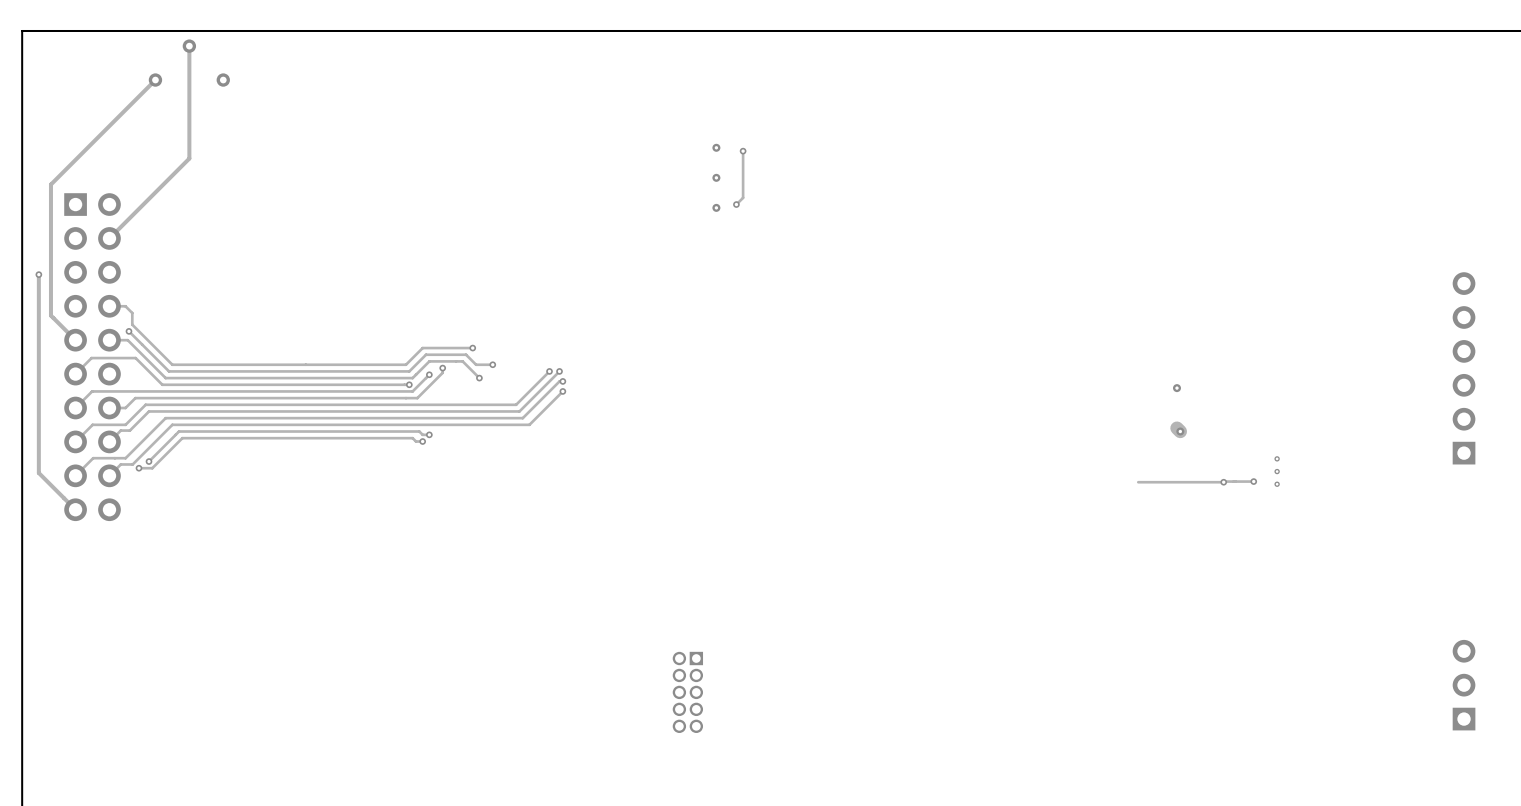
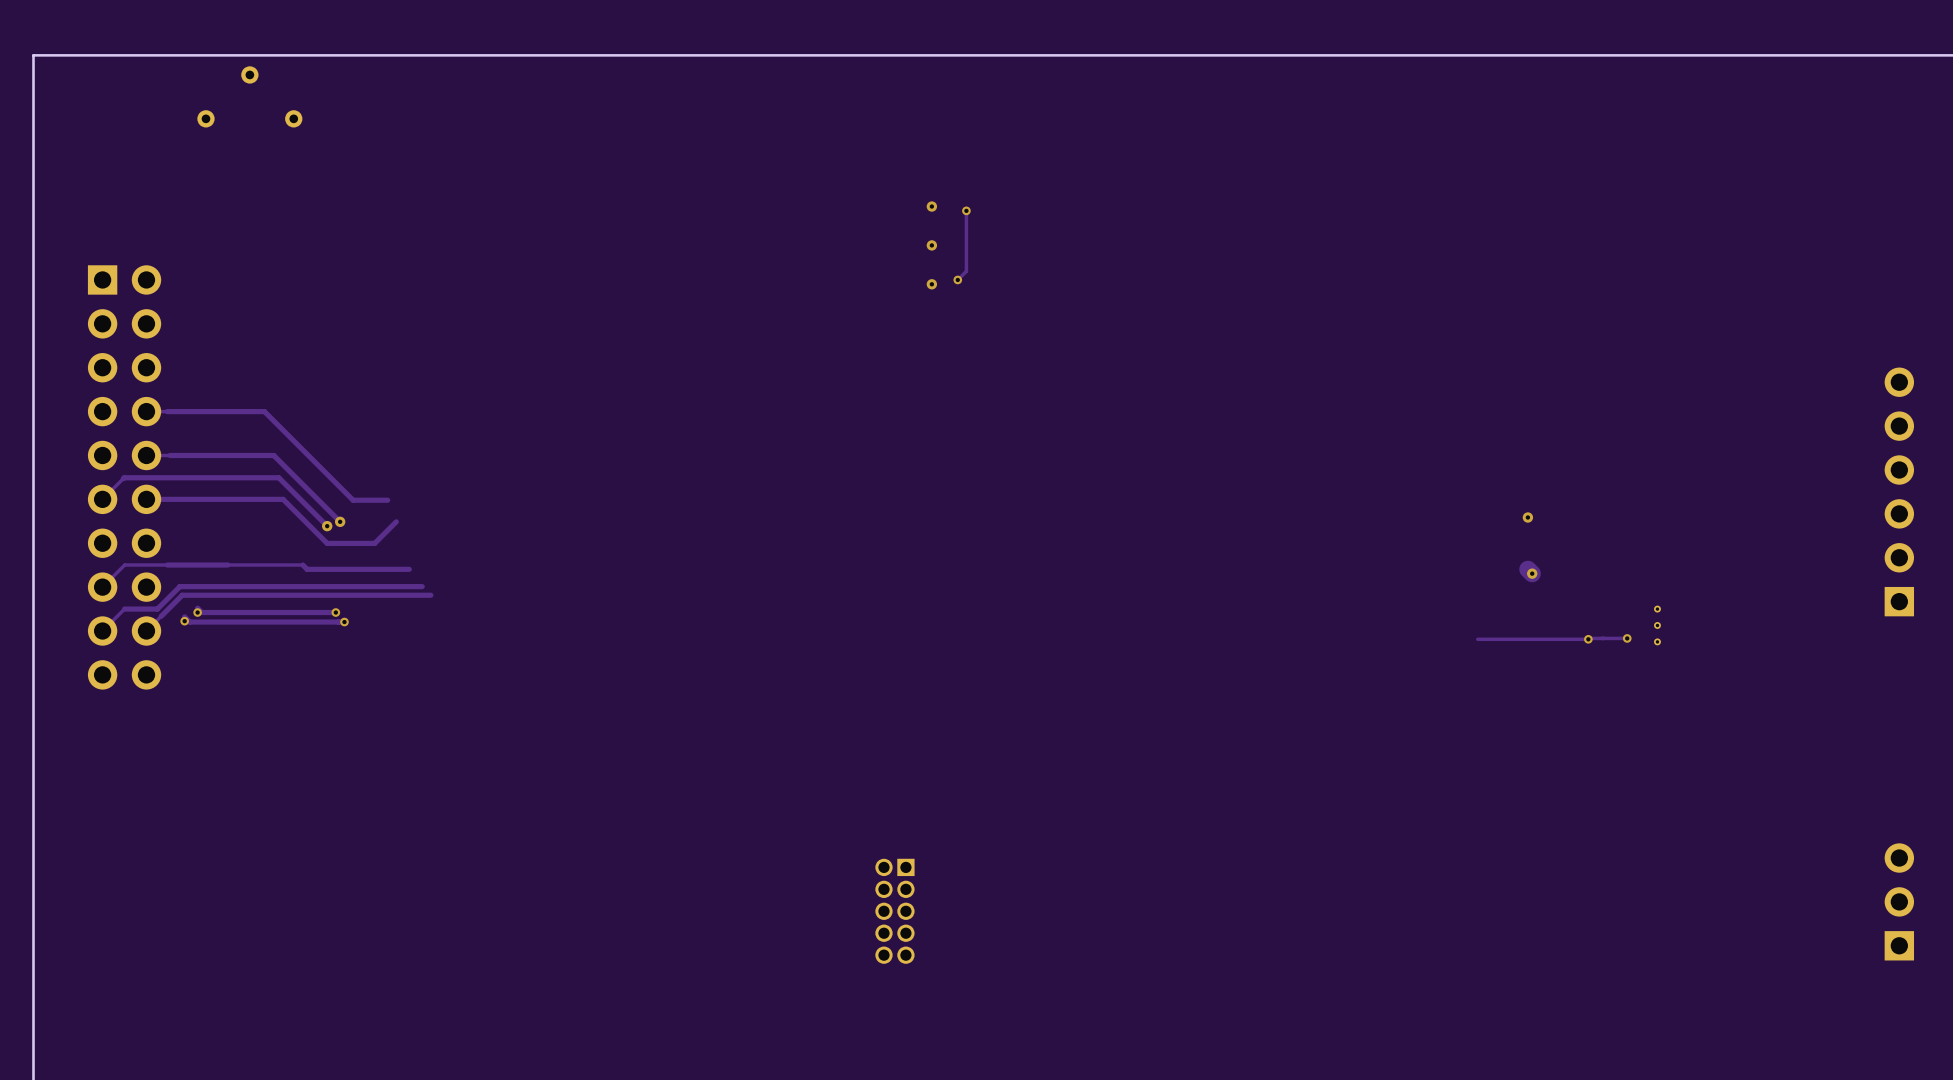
track: (189, 46) (189, 158) (109, 238) -> none
track: (155, 80) (50, 184) (50, 315) (75, 340) -> none
track: (38, 274) (38, 473) (75, 509) -> none
via: (38, 274) -> none
track: (125, 306) (132, 313) (132, 324) (172, 364) (405, 364) (422, 348) (472, 348) -> (167, 411) (264, 411) (353, 500) (387, 500)
track: (128, 331) (169, 371) (409, 371) (426, 354) (466, 354) (476, 364) (492, 364) -> none
via: (128, 331) -> none
track: (127, 340) (165, 378) (412, 378) (429, 361) (462, 361) (479, 378) -> (170, 455) (273, 455) (340, 521)
via: (472, 348) -> none
track: (91, 358) (135, 358) (162, 384) (409, 384) -> (123, 478) (278, 477) (327, 526)
via: (492, 364) -> none
track: (442, 368) (442, 372) (417, 398) (135, 398) (125, 408) (109, 408) -> none
via: (442, 368) -> none
track: (549, 371) (516, 404) (145, 404) (125, 424) -> none
via: (549, 371) -> none
track: (559, 371) (519, 411) (149, 411) (129, 430) (120, 430) (116, 434) -> none
via: (559, 371) -> none
track: none -> (146, 499) (283, 499) (327, 543) (374, 543) (396, 521)
track: (429, 374) (412, 391) (92, 391) (75, 408) -> none
via: (429, 374) -> none
via: (479, 378) -> none
track: (562, 381) (559, 381) (522, 418) (165, 418) (125, 458) (92, 458) -> (422, 586) (179, 586) (157, 609) (124, 609)
via: (562, 381) -> none
via: (409, 384) -> none
via: none -> (340, 521)
track: (562, 391) (529, 424) (230, 424) -> (409, 569) (307, 569) (302, 565)
via: (562, 391) -> none
via: none -> (327, 526)
track: (172, 424) (132, 464) (120, 464) -> (227, 565) (167, 565)
track: (429, 434) (422, 434) (419, 431) (179, 431) (149, 461) -> none
via: (429, 434) -> none
track: (422, 441) (416, 441) (412, 438) (182, 438) (152, 468) (138, 468) -> none
via: (422, 441) -> none
track: none -> (430, 595) (182, 595) (161, 616)
track: none -> (197, 608) (201, 612) (335, 612)
via: none -> (335, 612)
track: none -> (184, 616) (189, 622) (344, 622)
via: none -> (344, 622)

